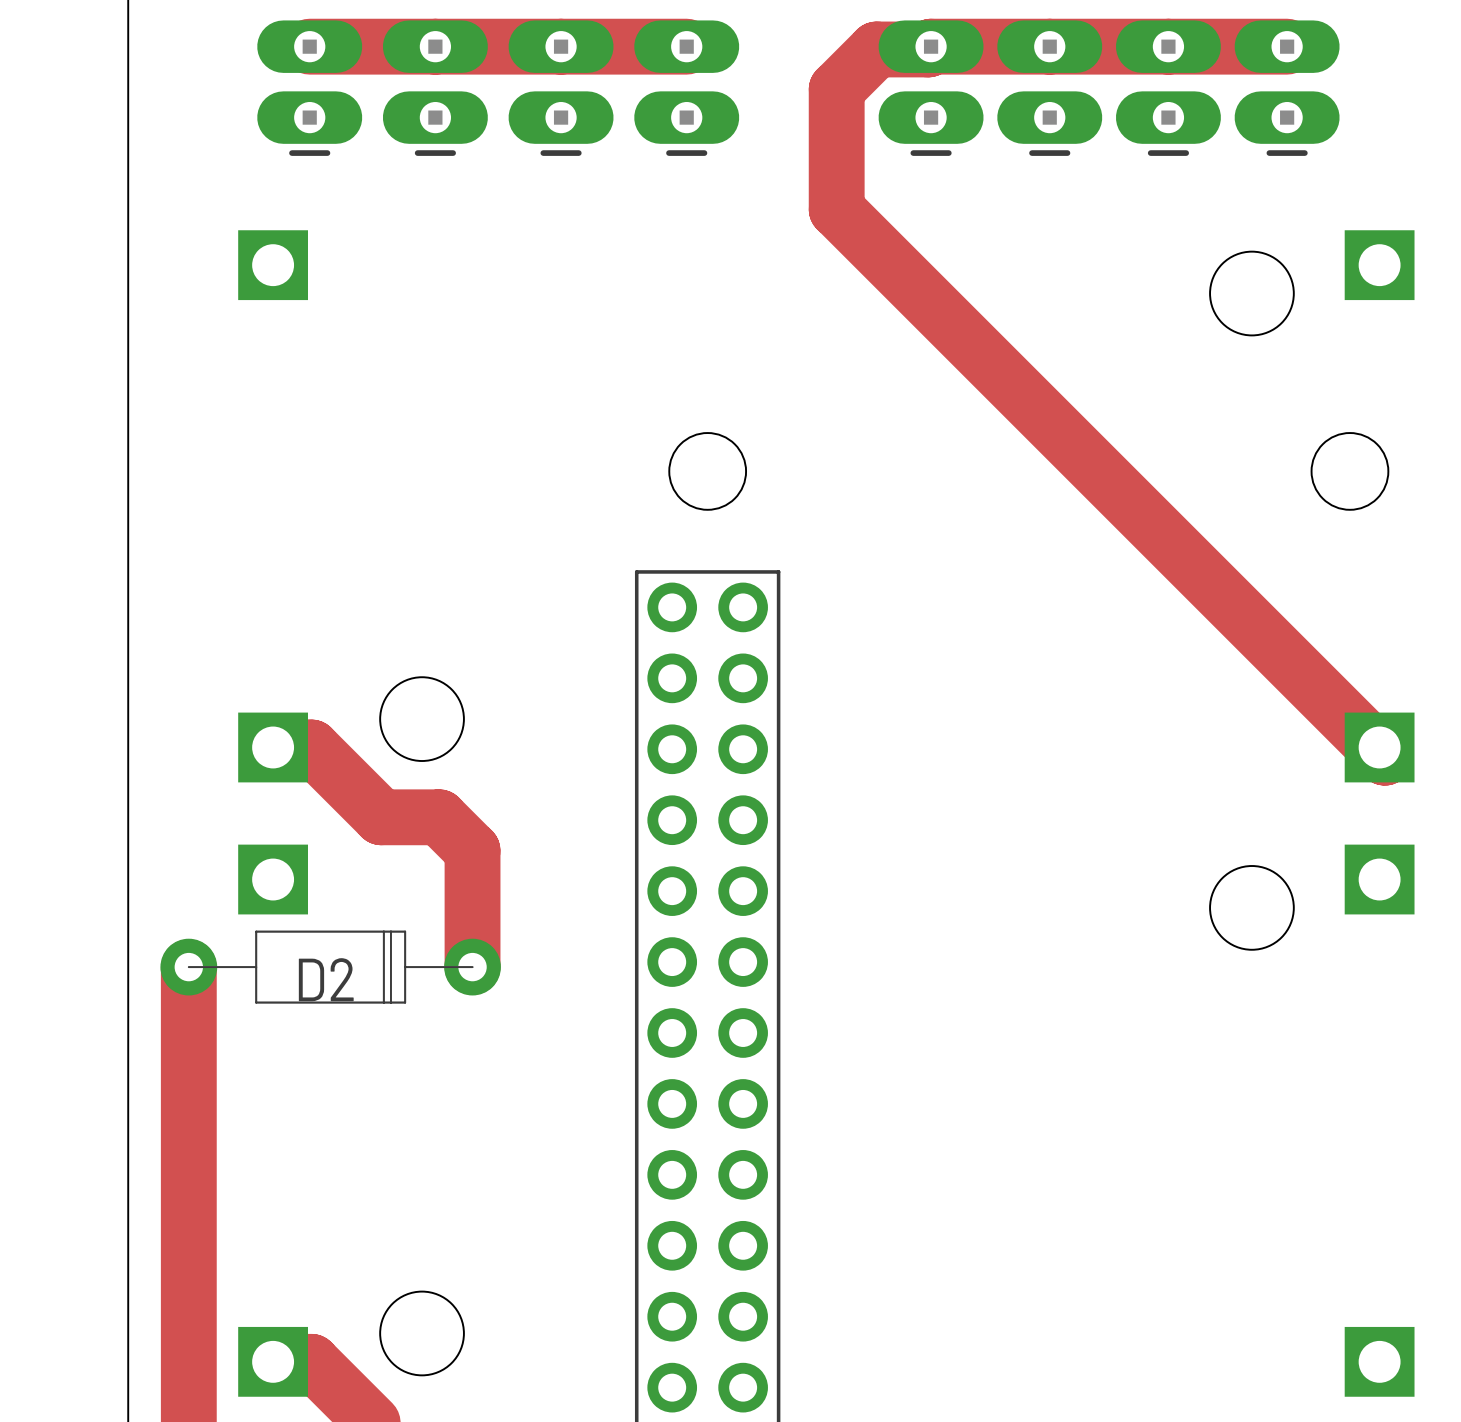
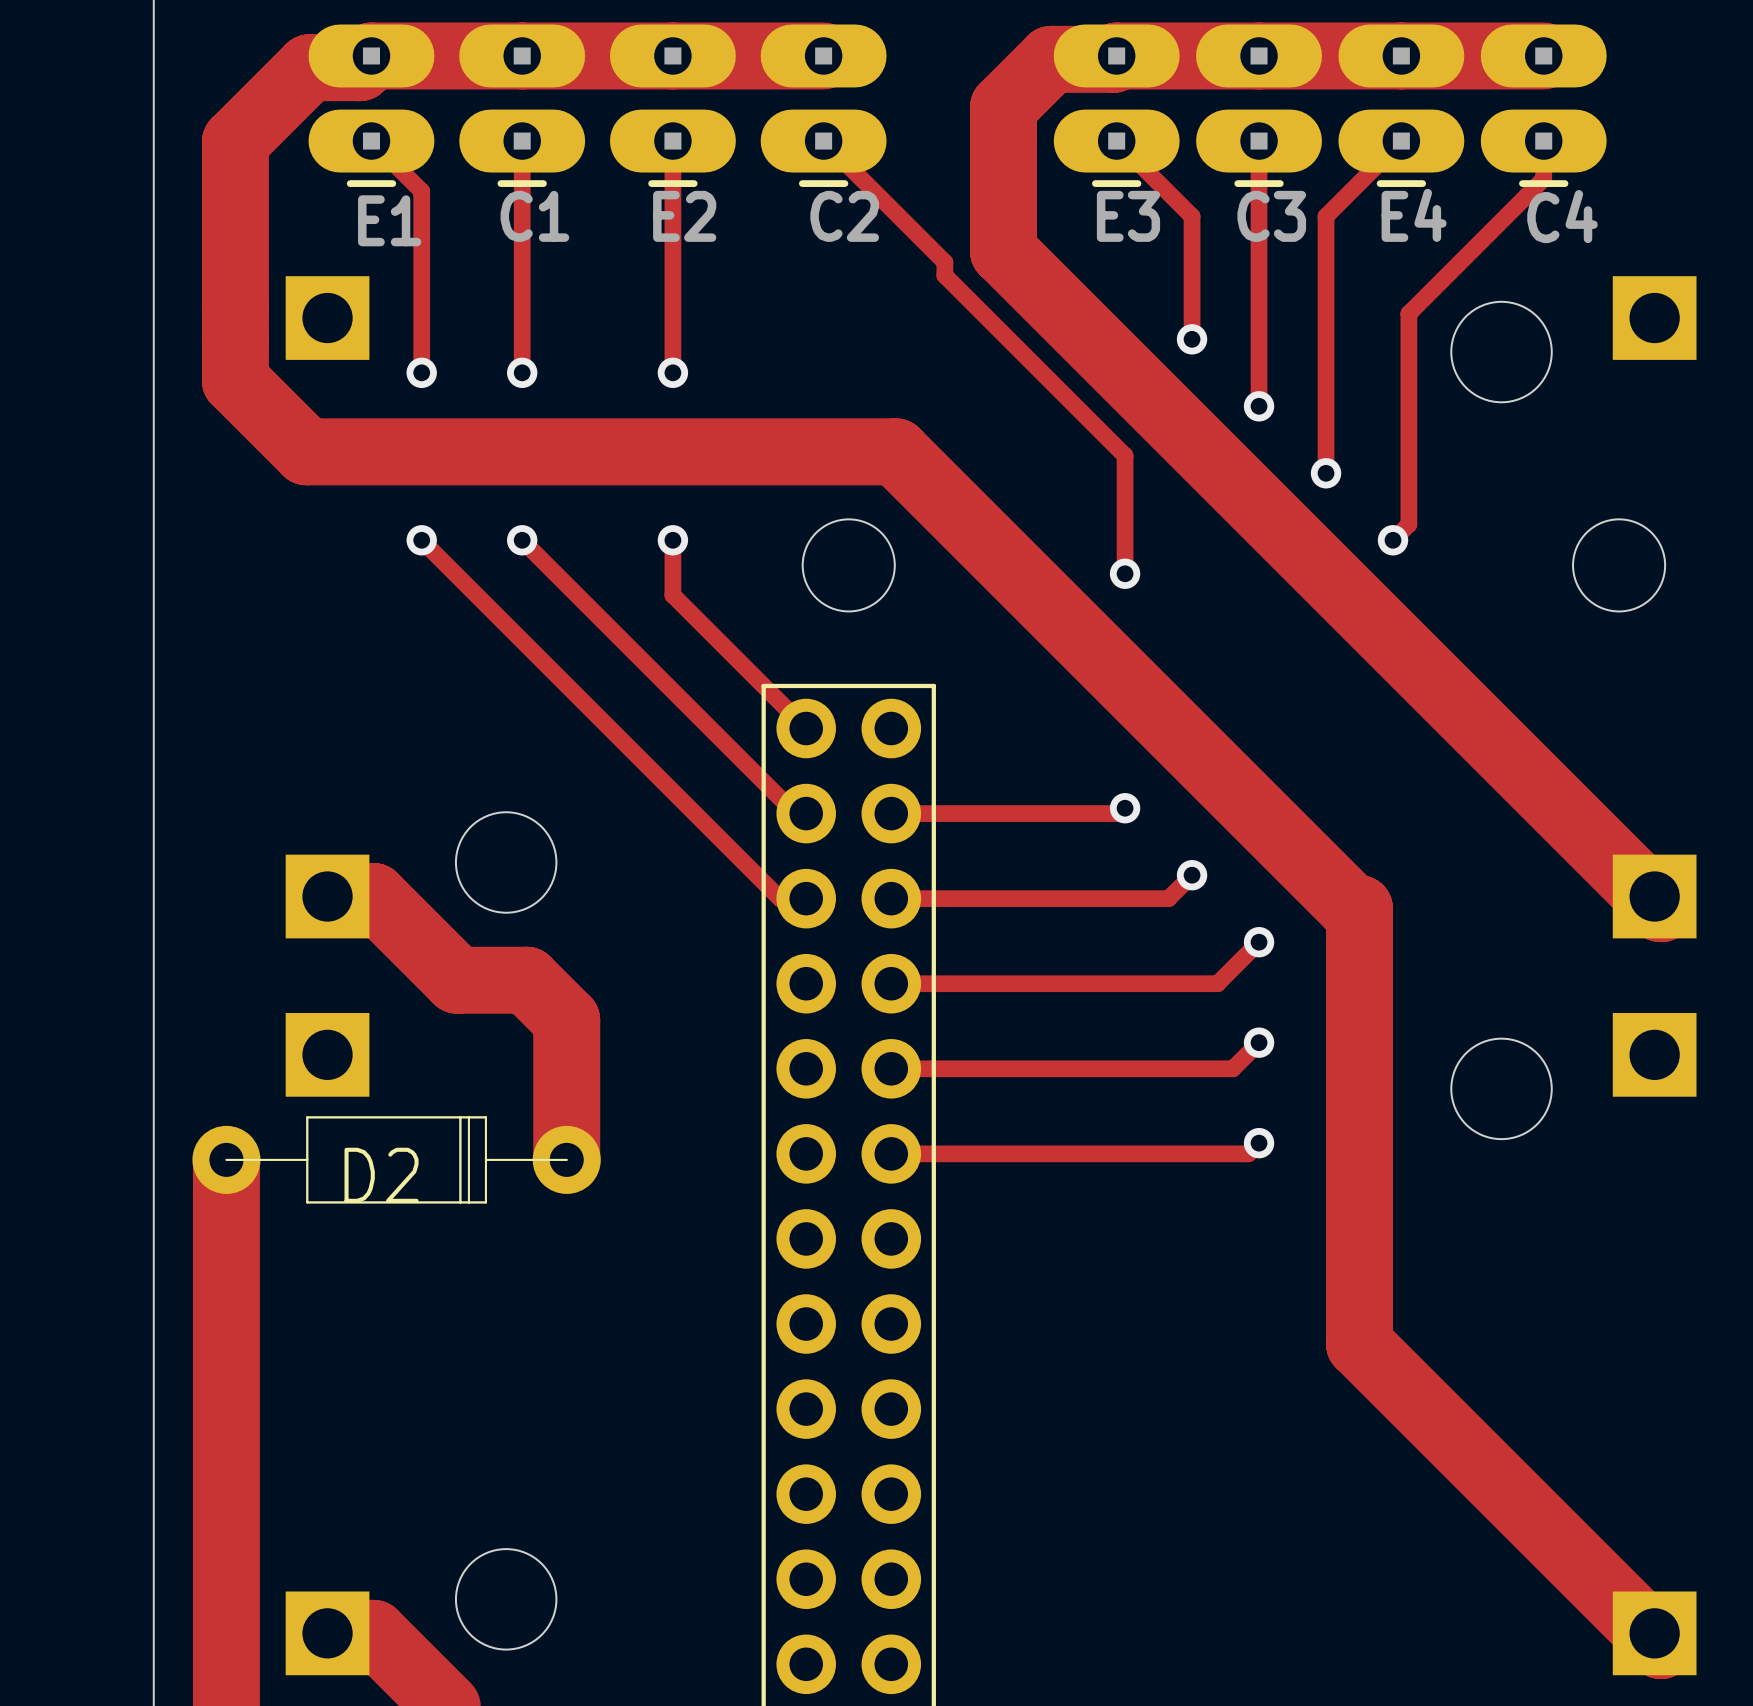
track: none -> (371, 55) (359, 67) (309, 67) (235, 141) (235, 380) (306, 451) (895, 451) (1352, 908) (1359, 908) (1359, 1344) (1660, 1645) (1660, 1639) (1654, 1633)
track: none -> (371, 141) (421, 191) (421, 372)
track: none -> (522, 141) (522, 372)
track: none -> (672, 141) (672, 372)
track: none -> (823, 141) (944, 262) (944, 275) (1125, 455) (1125, 573)
track: none -> (1116, 141) (1192, 216) (1192, 339)
track: none -> (1259, 141) (1259, 406)
track: none -> (1401, 141) (1326, 216) (1326, 473)
track: none -> (1543, 141) (1543, 178) (1408, 313) (1408, 524) (1393, 540)
C1 name: none -> C1 (534, 216)
E2 name: none -> E2 (684, 216)
C2 name: none -> C2 (844, 216)
E3 name: none -> E3 (1128, 216)
C3 name: none -> C3 (1271, 216)
E4 name: none -> E4 (1414, 215)
C4 name: none -> C4 (1562, 216)
E1 name: none -> E1 (389, 220)
via: none -> (1192, 339)
via: none -> (421, 372)
via: none -> (522, 372)
via: none -> (672, 372)
via: none -> (1259, 406)
via: none -> (1326, 473)
track: none -> (421, 540) (780, 898) (806, 898)
via: none -> (421, 540)
track: none -> (522, 540) (795, 813) (806, 813)
via: none -> (522, 540)
track: none -> (672, 540) (672, 595) (806, 728)
via: none -> (672, 540)
via: none -> (1393, 540)
via: none -> (1125, 573)
track: none -> (1125, 808) (1119, 813) (891, 813)
via: none -> (1125, 808)
track: none -> (1192, 875) (1168, 898) (891, 898)
via: none -> (1192, 875)
track: none -> (1259, 942) (1217, 983) (891, 983)
via: none -> (1259, 942)
track: none -> (1259, 1042) (1232, 1068) (891, 1068)
via: none -> (1259, 1042)
track: none -> (1259, 1143) (1248, 1153) (891, 1153)
via: none -> (1259, 1143)

